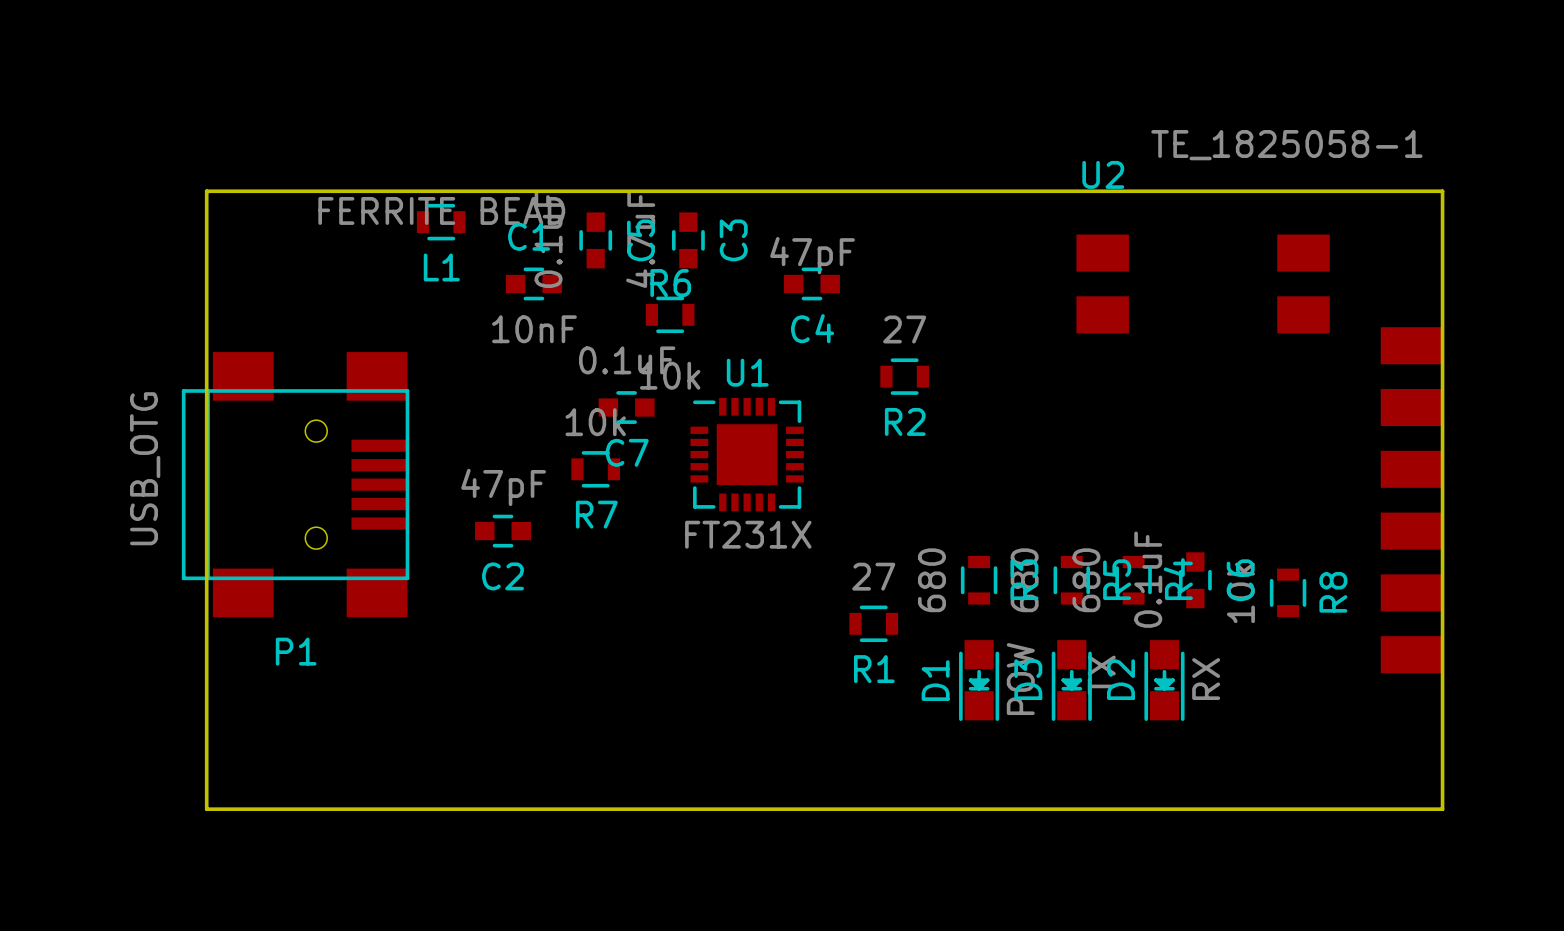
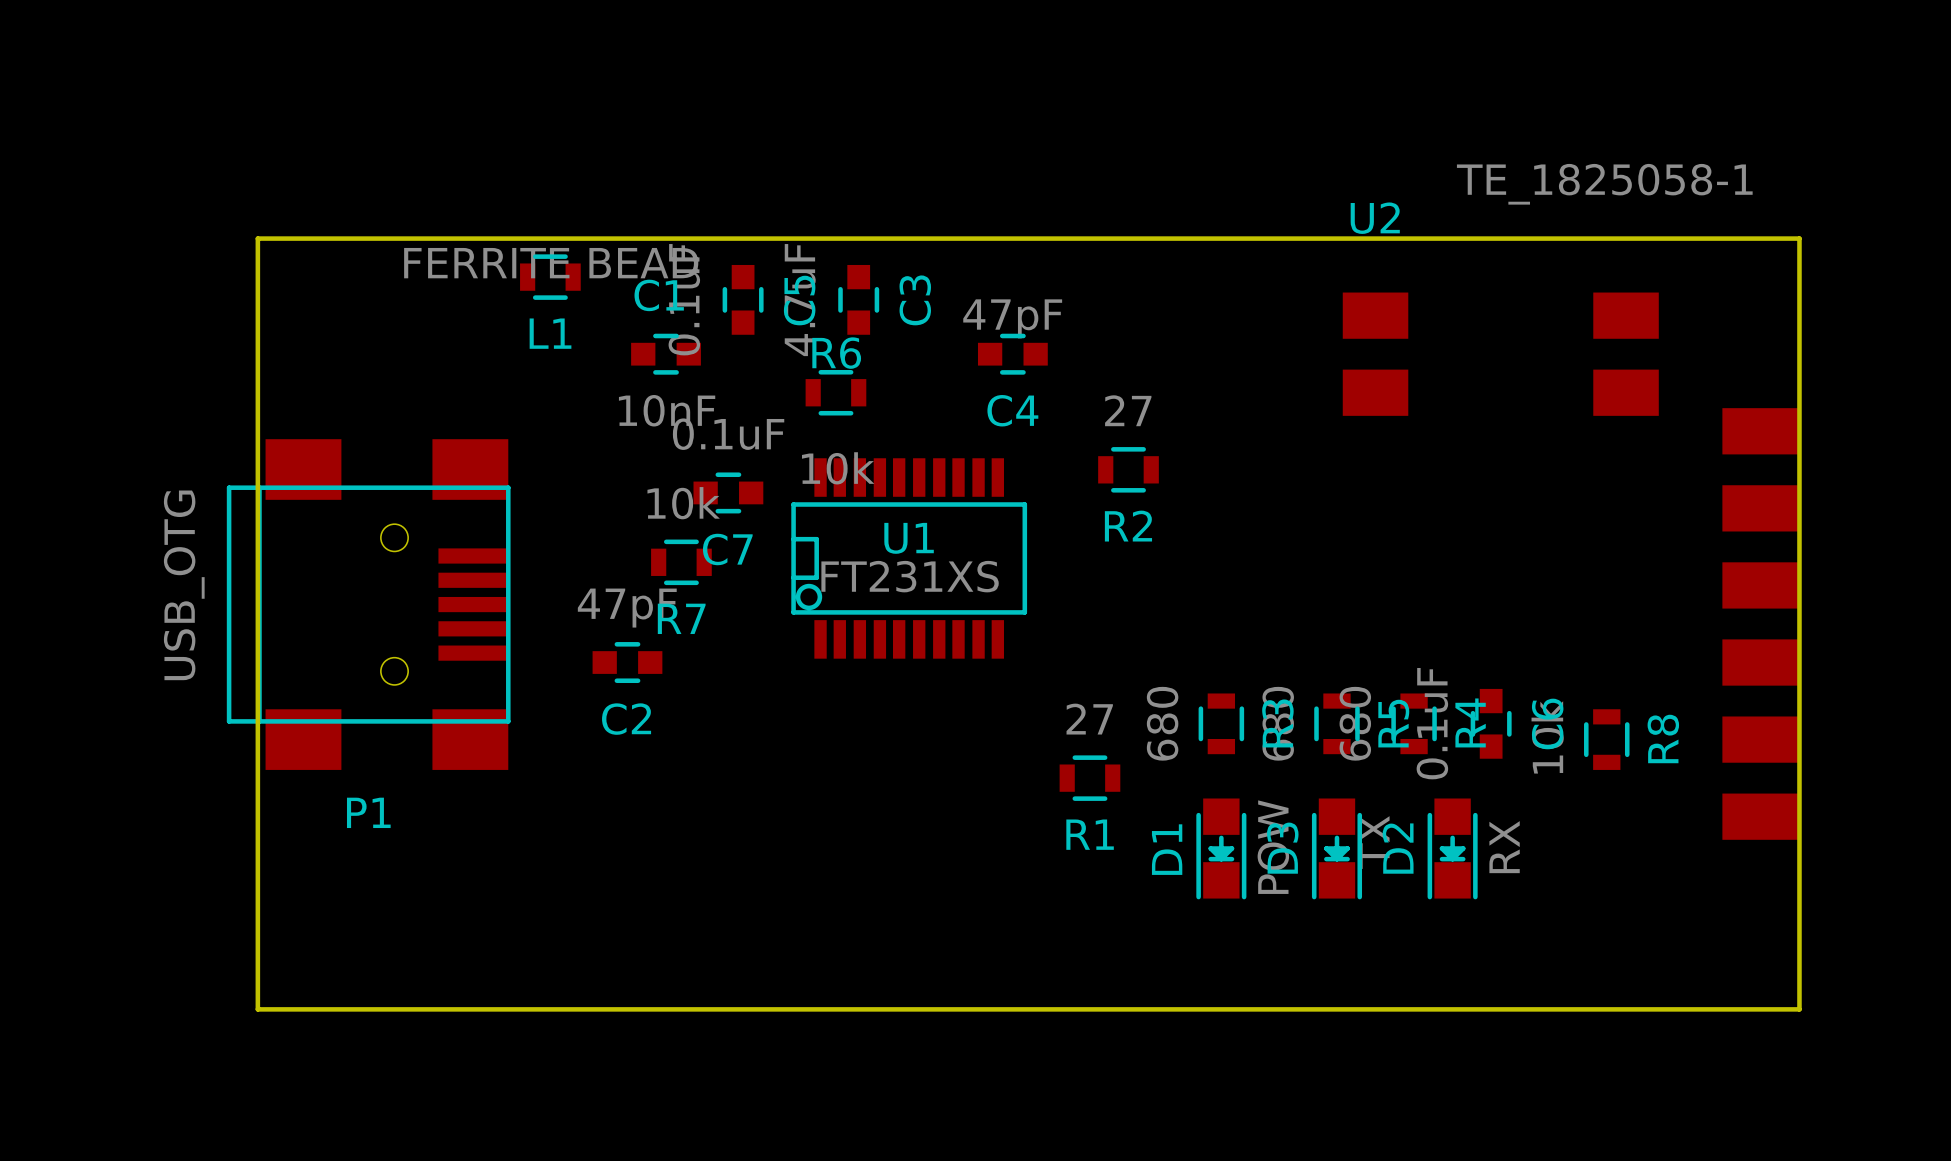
U1 name position: U1 (747, 372) -> U1 (909, 538)
U1 footprint: [690, 397, 804, 512] -> [791, 458, 1028, 659]
C7 position: (626, 407) -> (728, 492)
R7 position: (595, 469) -> (681, 562)
U1 value: FT231X (748, 534) -> FT231XS (910, 576)

